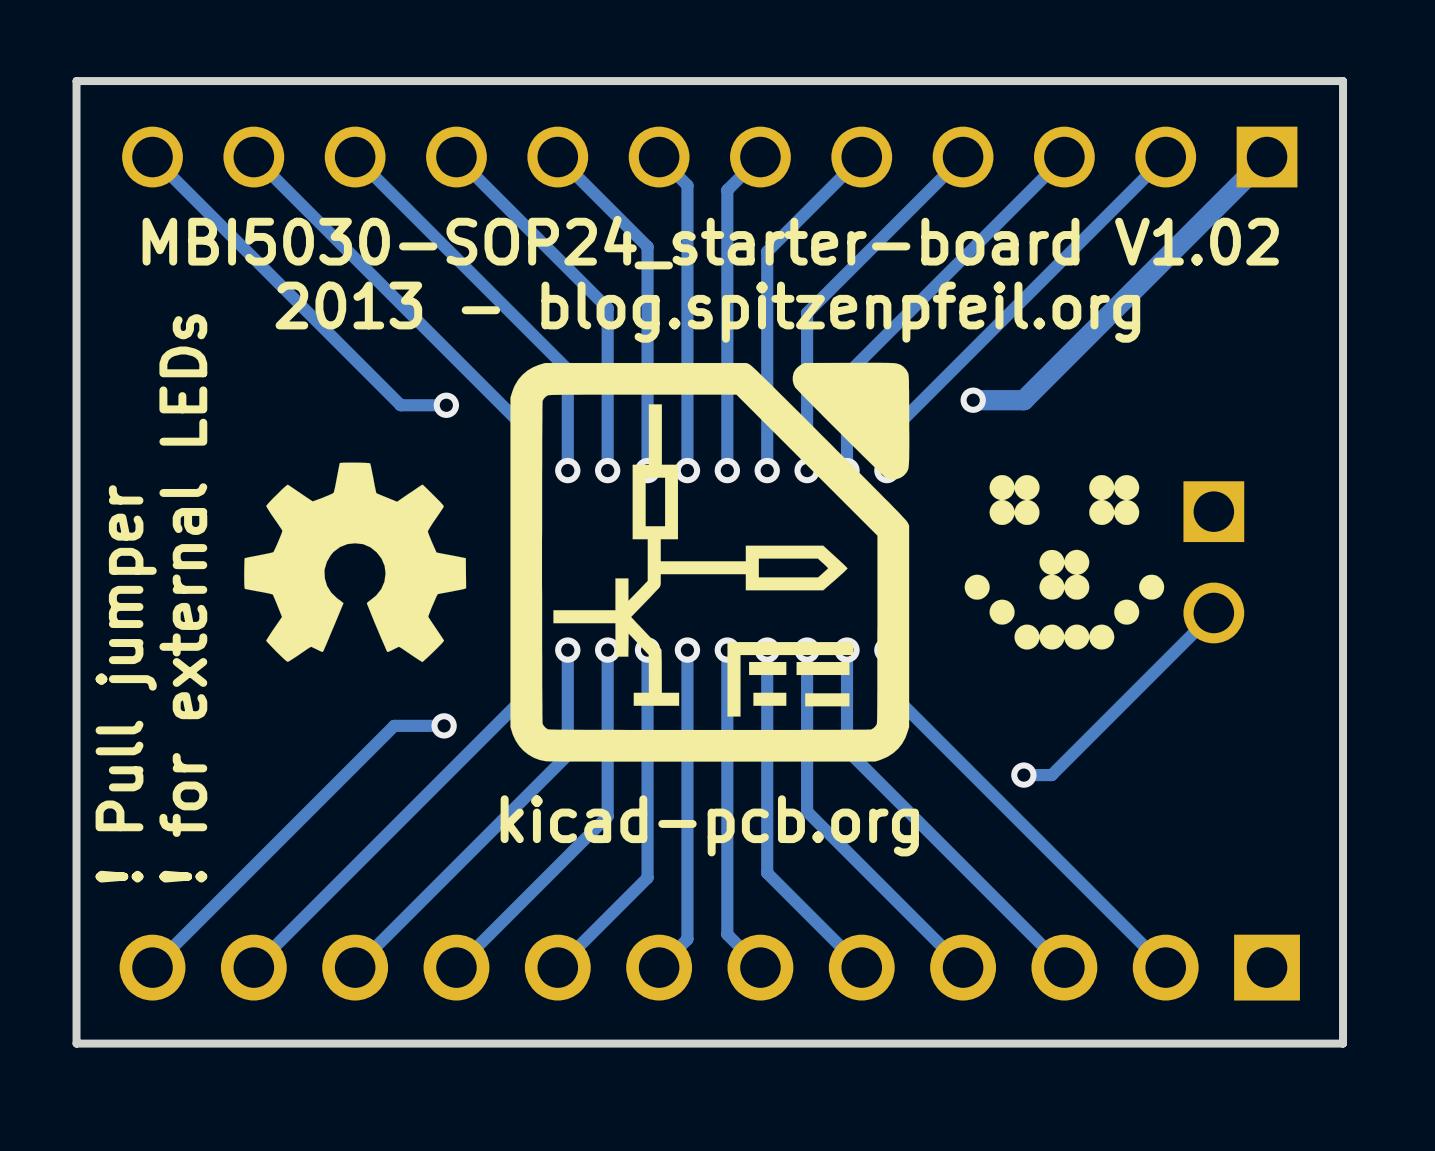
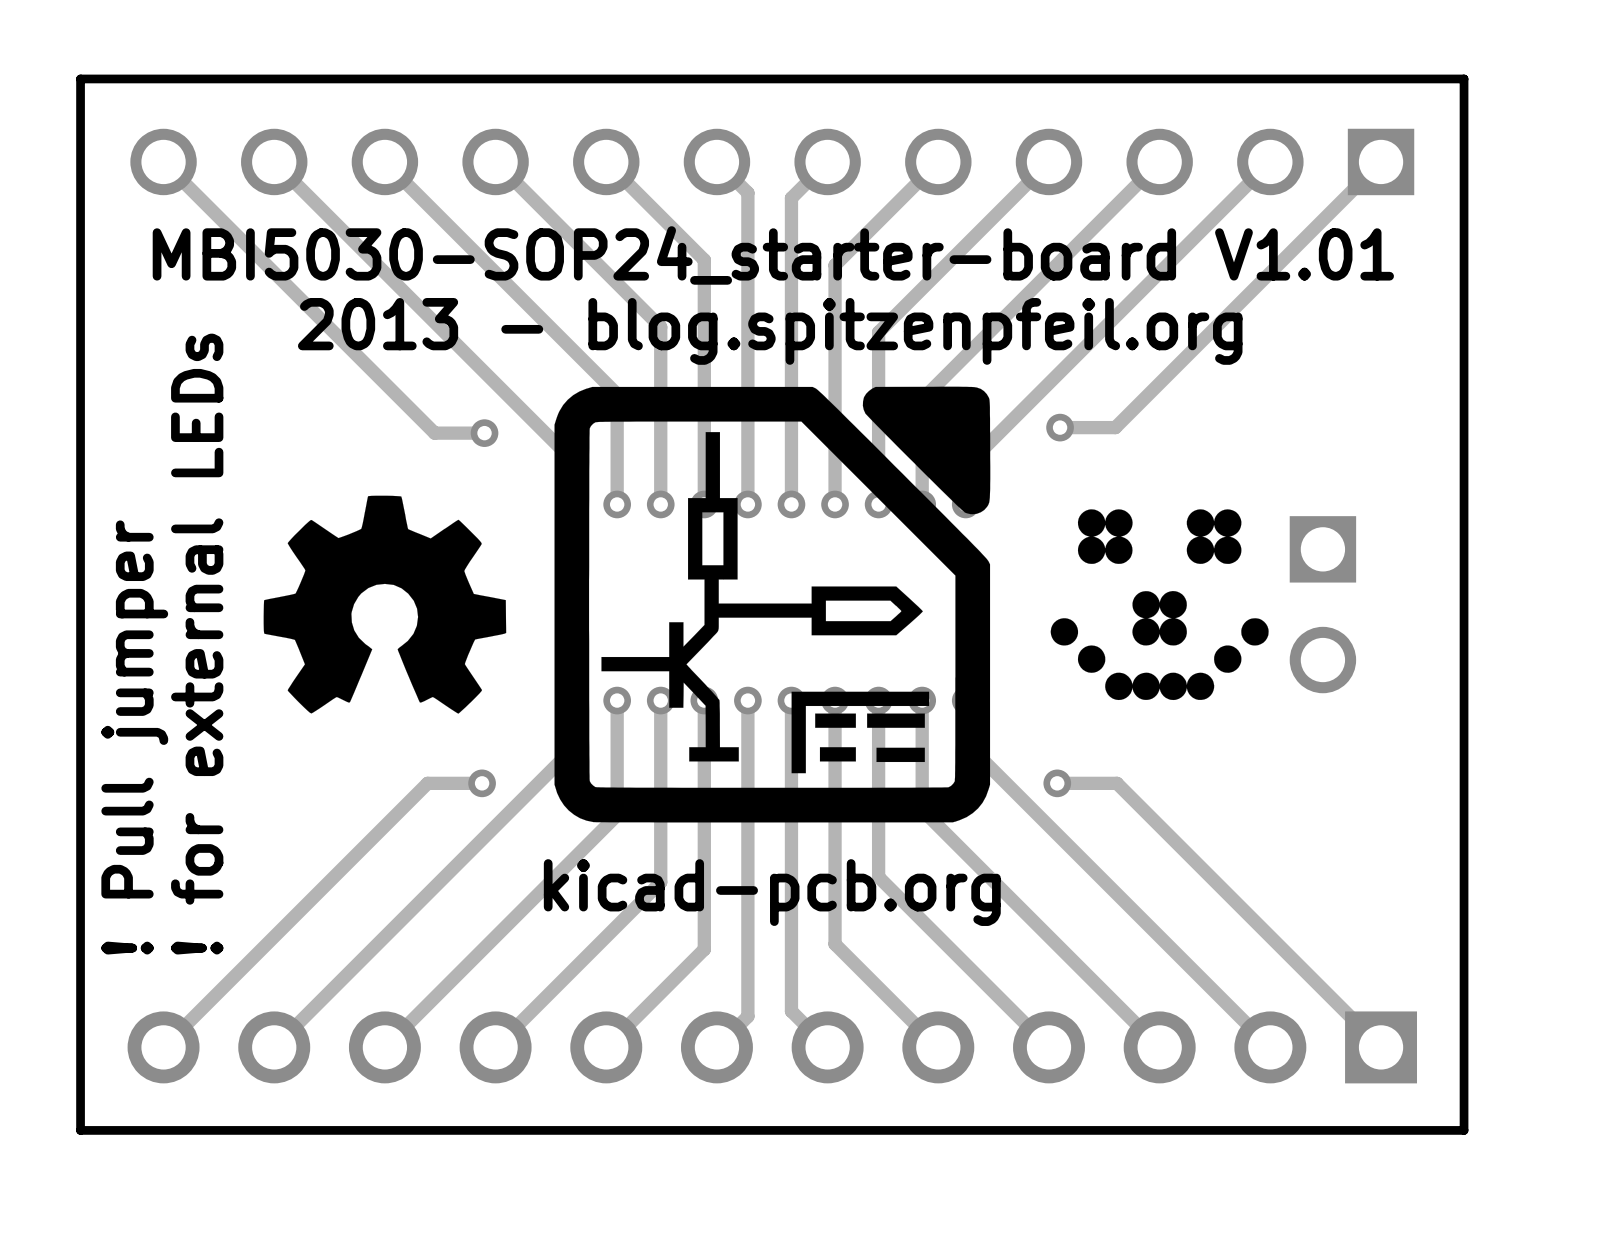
track width: thick (1267, 157) (1023, 400) (973, 400) -> thin (1381, 161) (1115, 427) (1060, 427)
text: MBI5030-SOP24_starter-board V1.02 (710, 242) -> MBI5030-SOP24_starter-board V1.01 (773, 255)
track: (1213, 612) (1051, 775) (1023, 775) -> none
track: none -> (1057, 783) (1116, 783) (1381, 1047)
via position: (1023, 775) -> (1057, 783)

